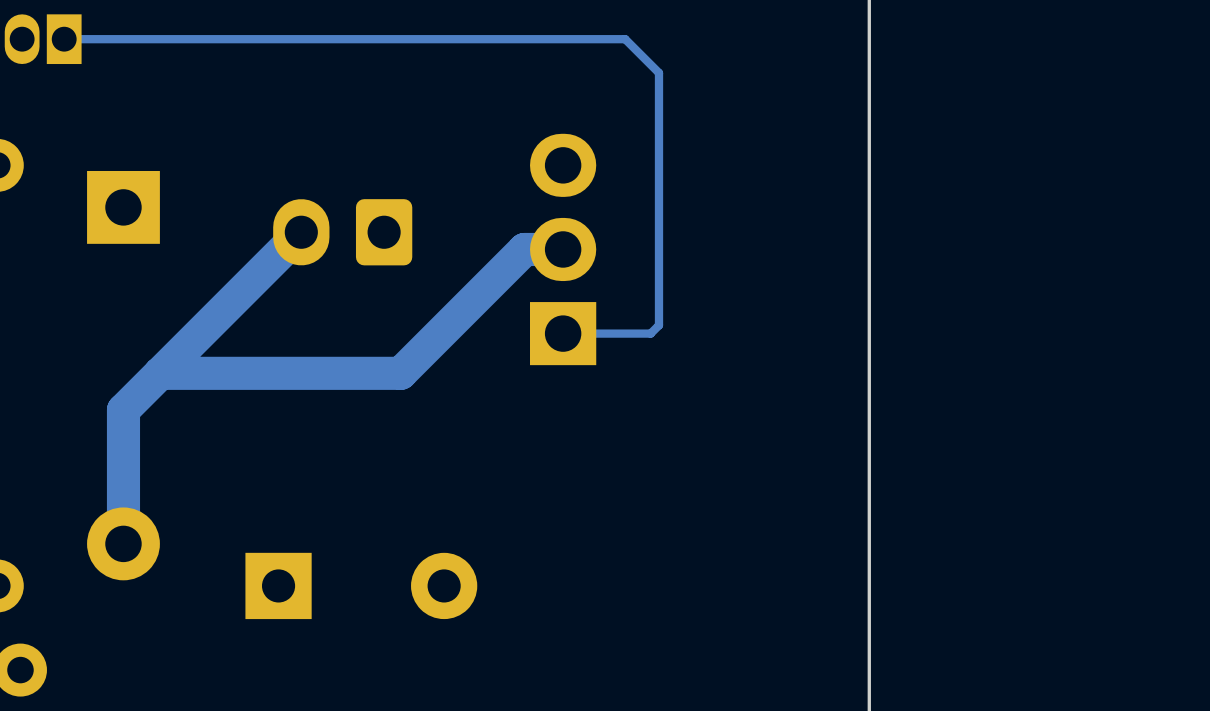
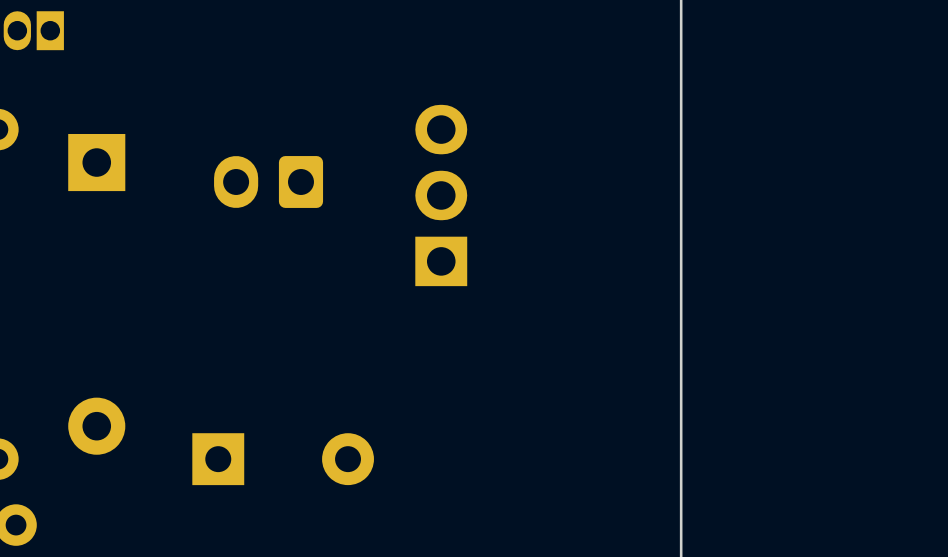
track: (64, 39) (625, 39) (658, 72) (658, 325) (650, 333) (563, 333) -> none
track: (301, 232) (123, 410) (123, 543) -> none
track: (563, 249) (524, 249) (400, 373) (160, 373) -> none

